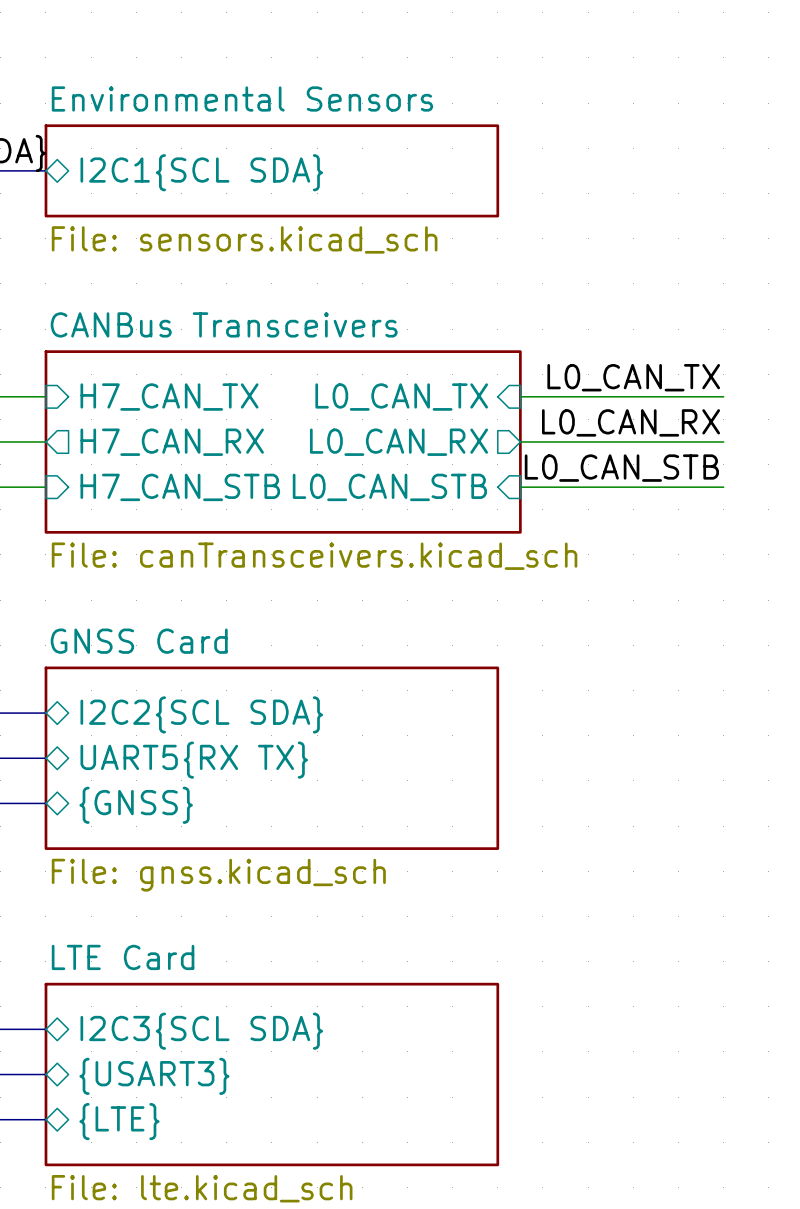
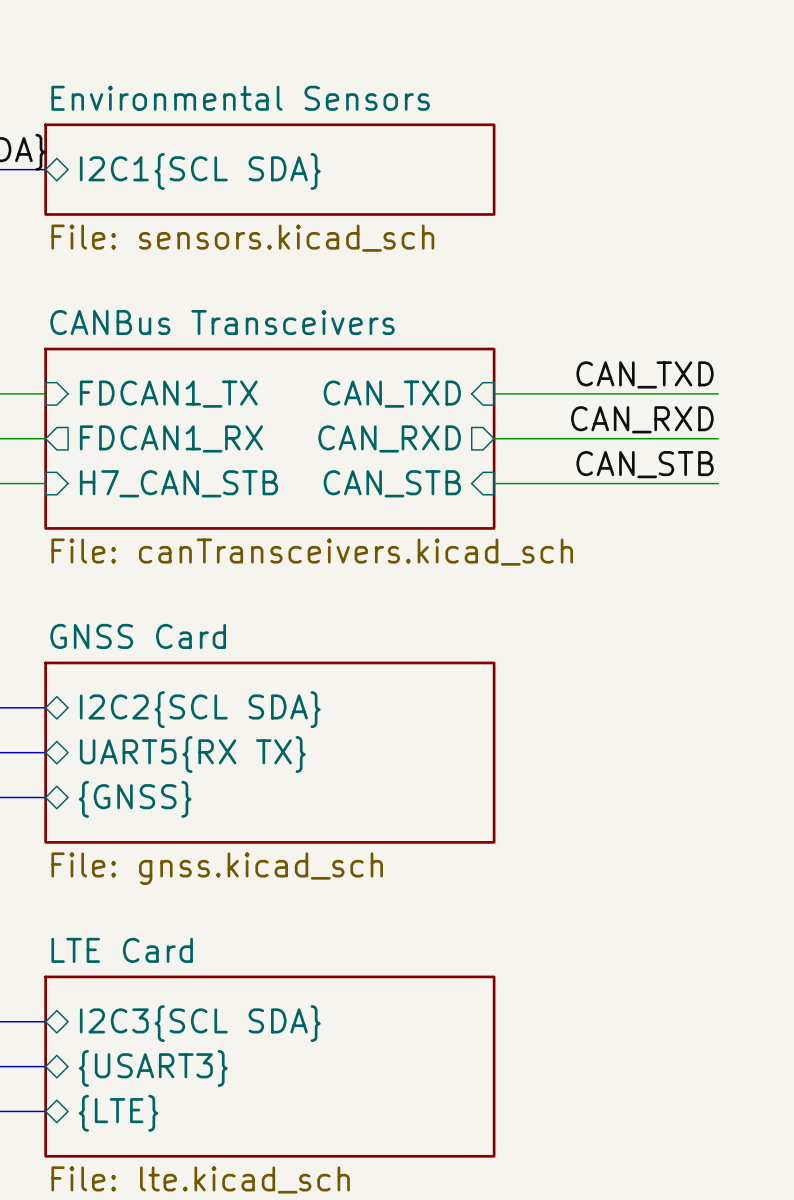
sheet CANBus Transceivers shape: [44, 350, 522, 534] -> [44, 347, 496, 530]
label: L0_CAN_TX (633, 377) -> CAN_TXD (645, 374)
wire: none -> (494, 393) (516, 393)
sheet pin: H7_CAN_TX (169, 397) -> FDCAN1_TX (168, 394)
sheet pin: L0_CAN_TX (401, 397) -> CAN_TXD (392, 394)
label: L0_CAN_RX (631, 422) -> CAN_RXD (642, 419)
wire: none -> (494, 438) (516, 438)
sheet pin: H7_CAN_RX (172, 442) -> FDCAN1_RX (171, 438)
sheet pin: L0_CAN_RX (399, 442) -> CAN_RXD (389, 438)
label: L0_CAN_STB (621, 468) -> CAN_STB (645, 464)
sheet pin: L0_CAN_STB (389, 487) -> CAN_STB (392, 483)
wire: none -> (494, 483) (516, 483)

